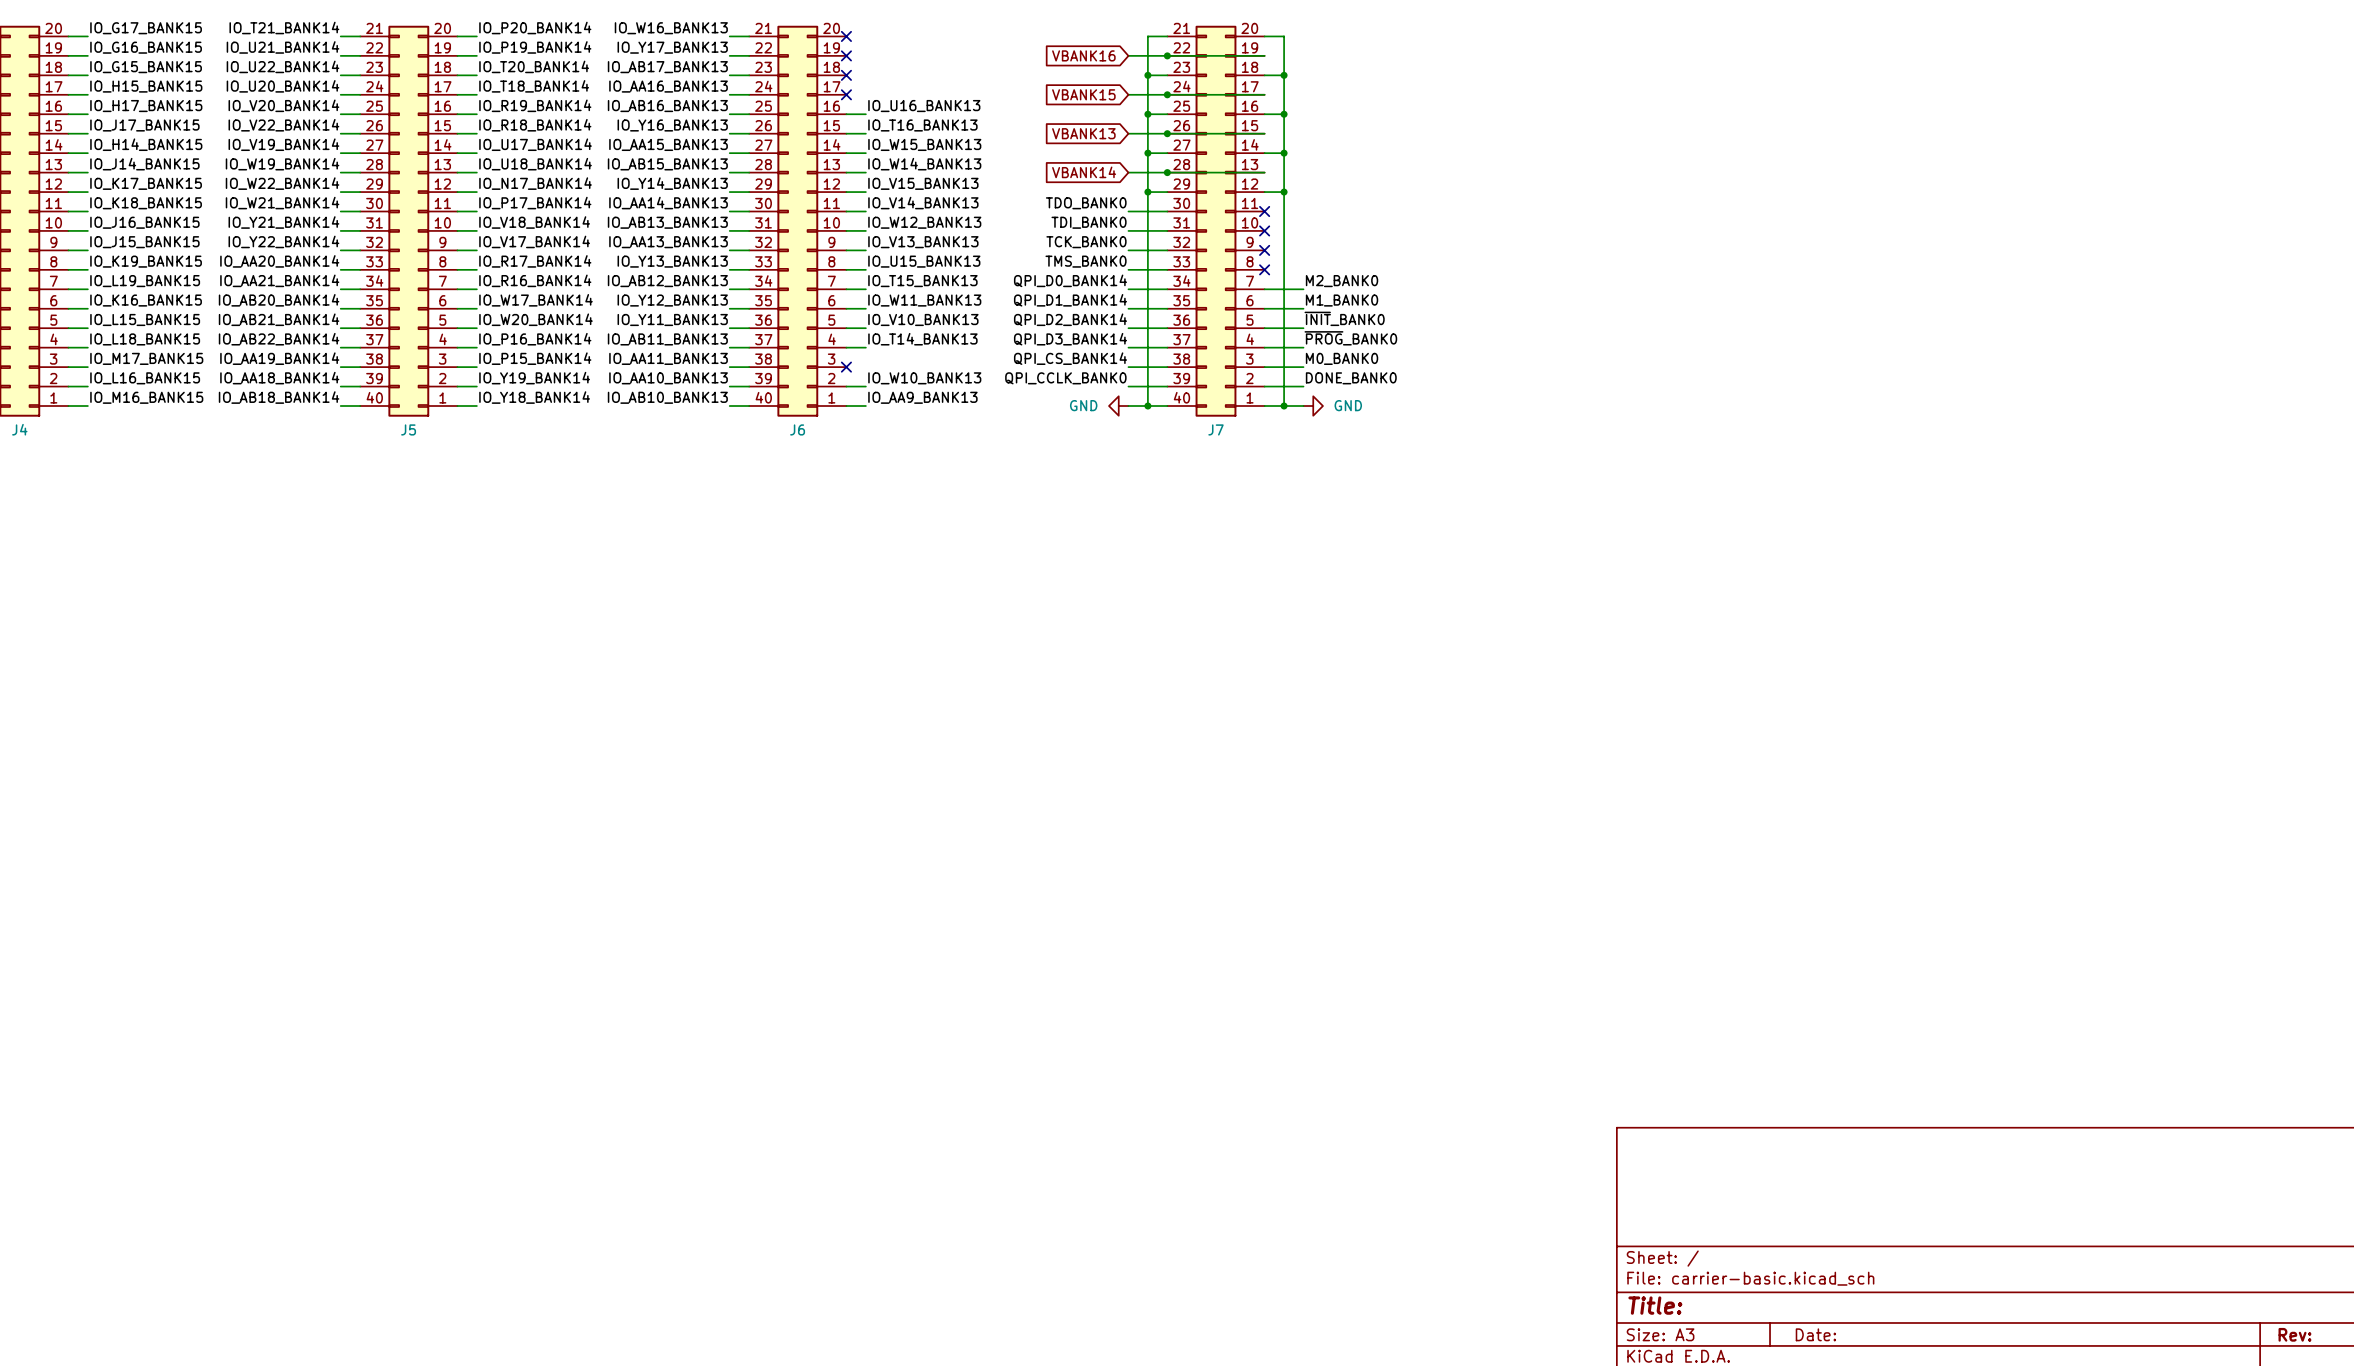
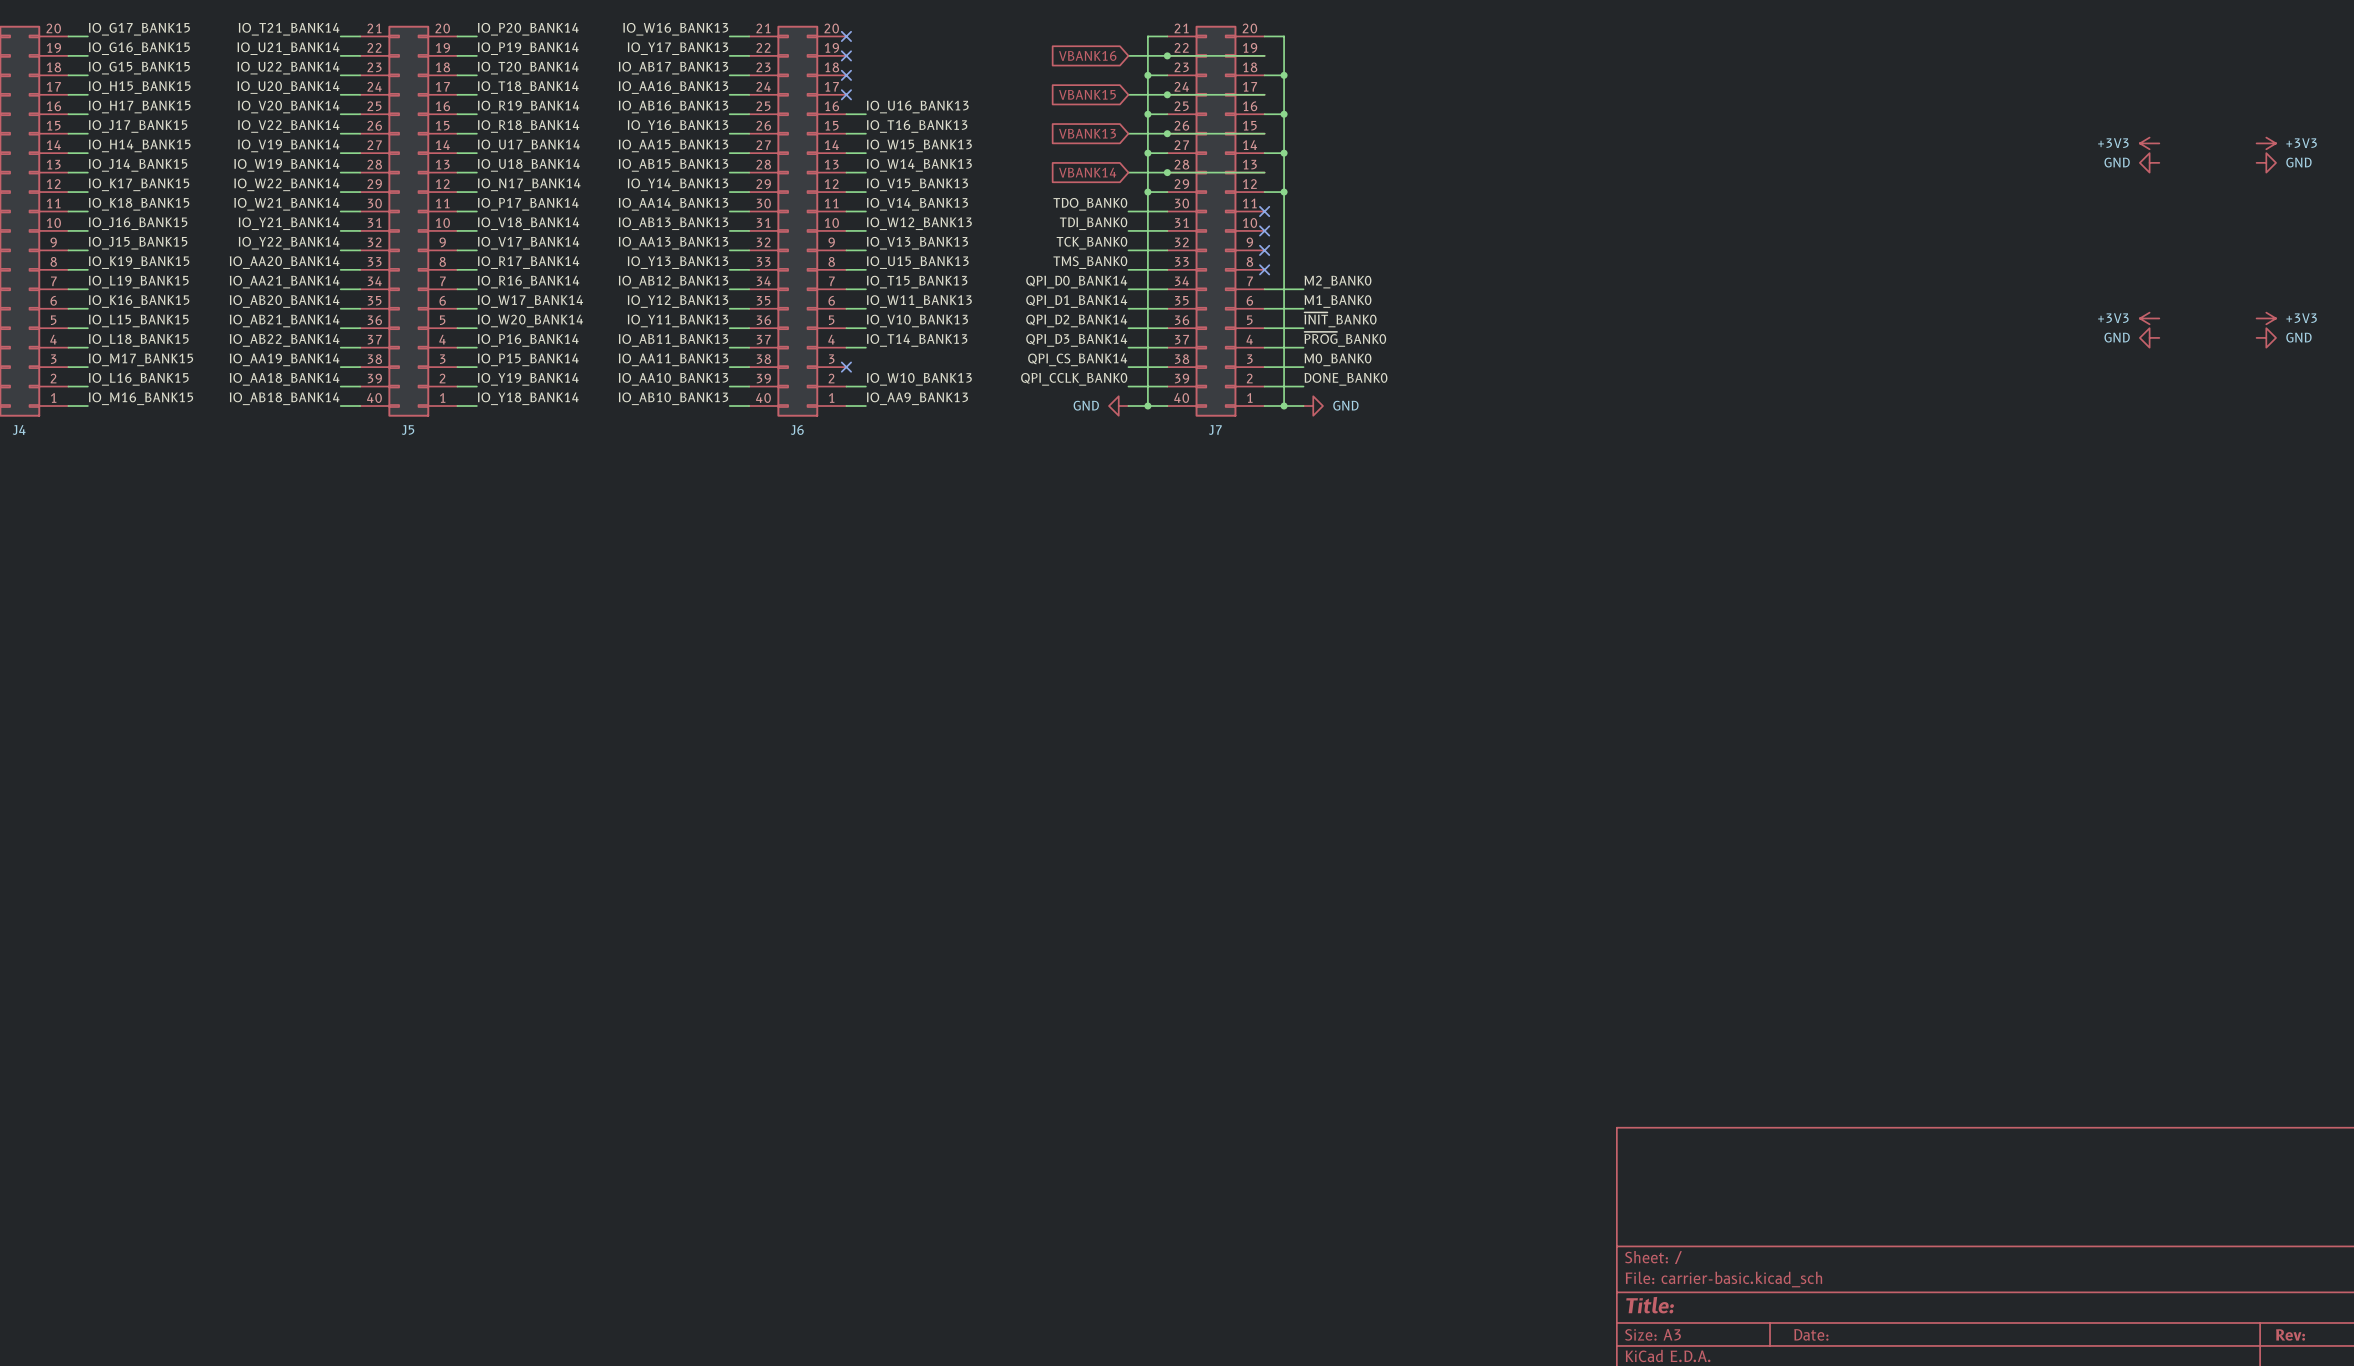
power symbol: none -> +3V3 (2149, 143)
power symbol: none -> +3V3 (2266, 143)
power symbol: none -> GND (2149, 162)
power symbol: none -> GND (2266, 162)
power symbol: none -> +3V3 (2149, 318)
power symbol: none -> +3V3 (2266, 318)
power symbol: none -> GND (2149, 337)
power symbol: none -> GND (2266, 337)

